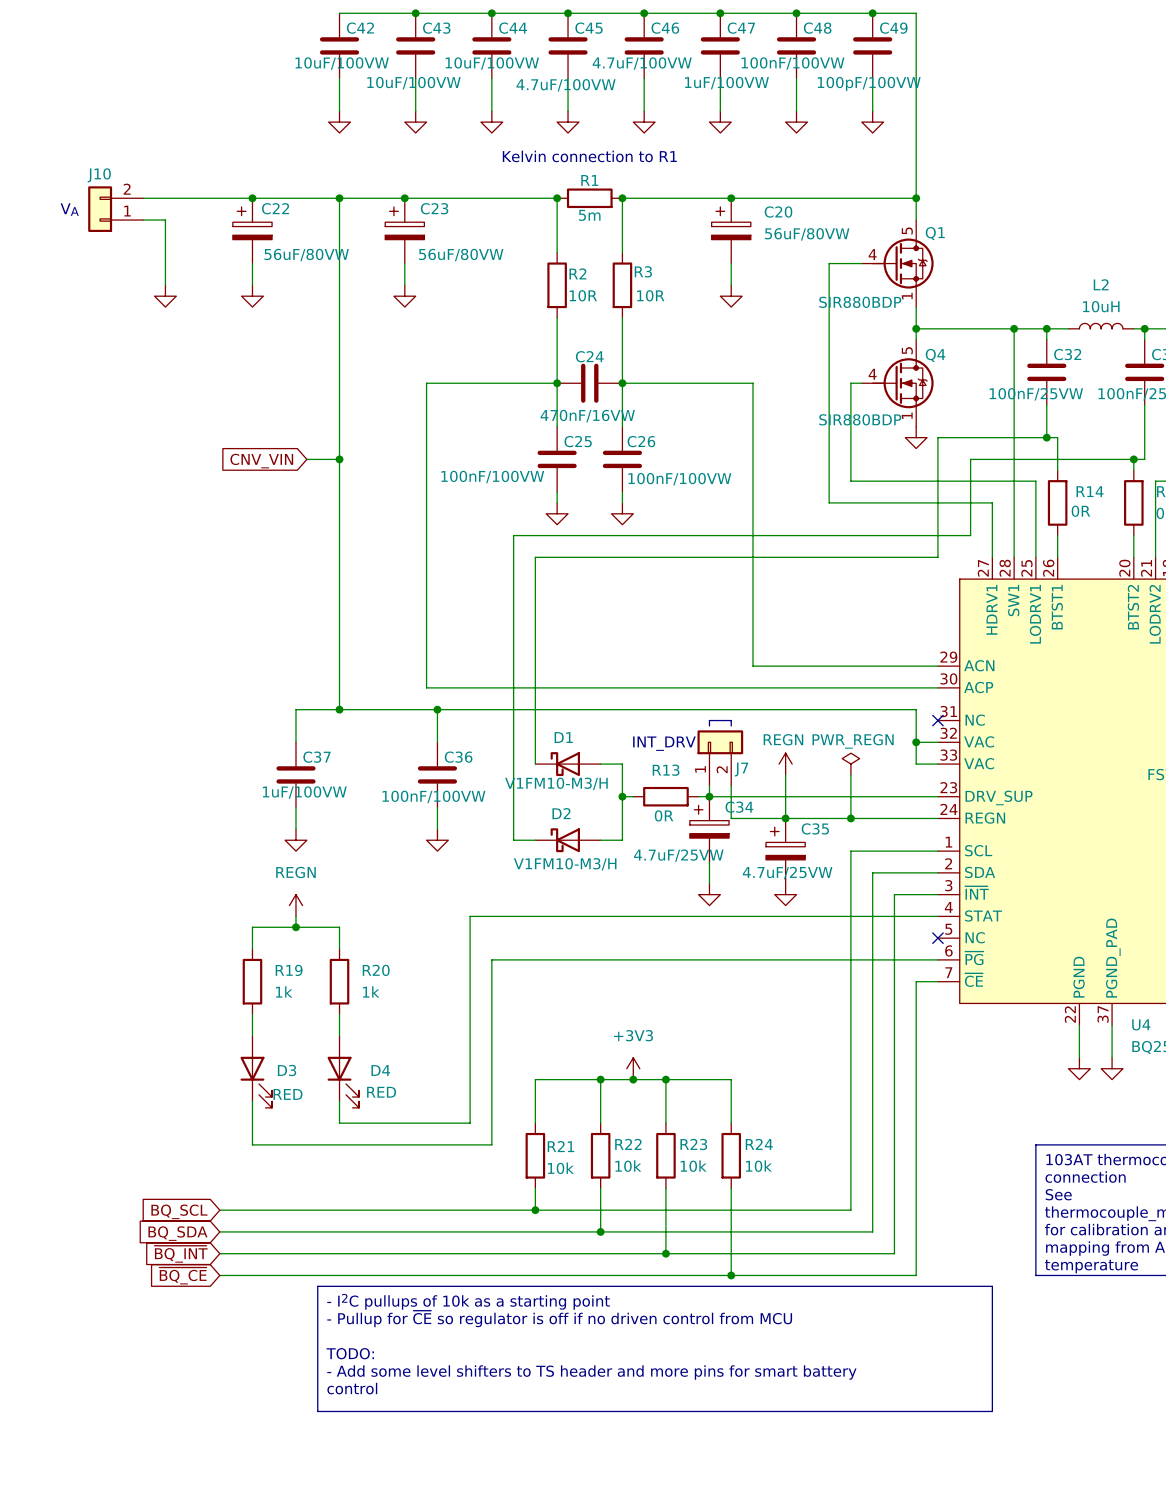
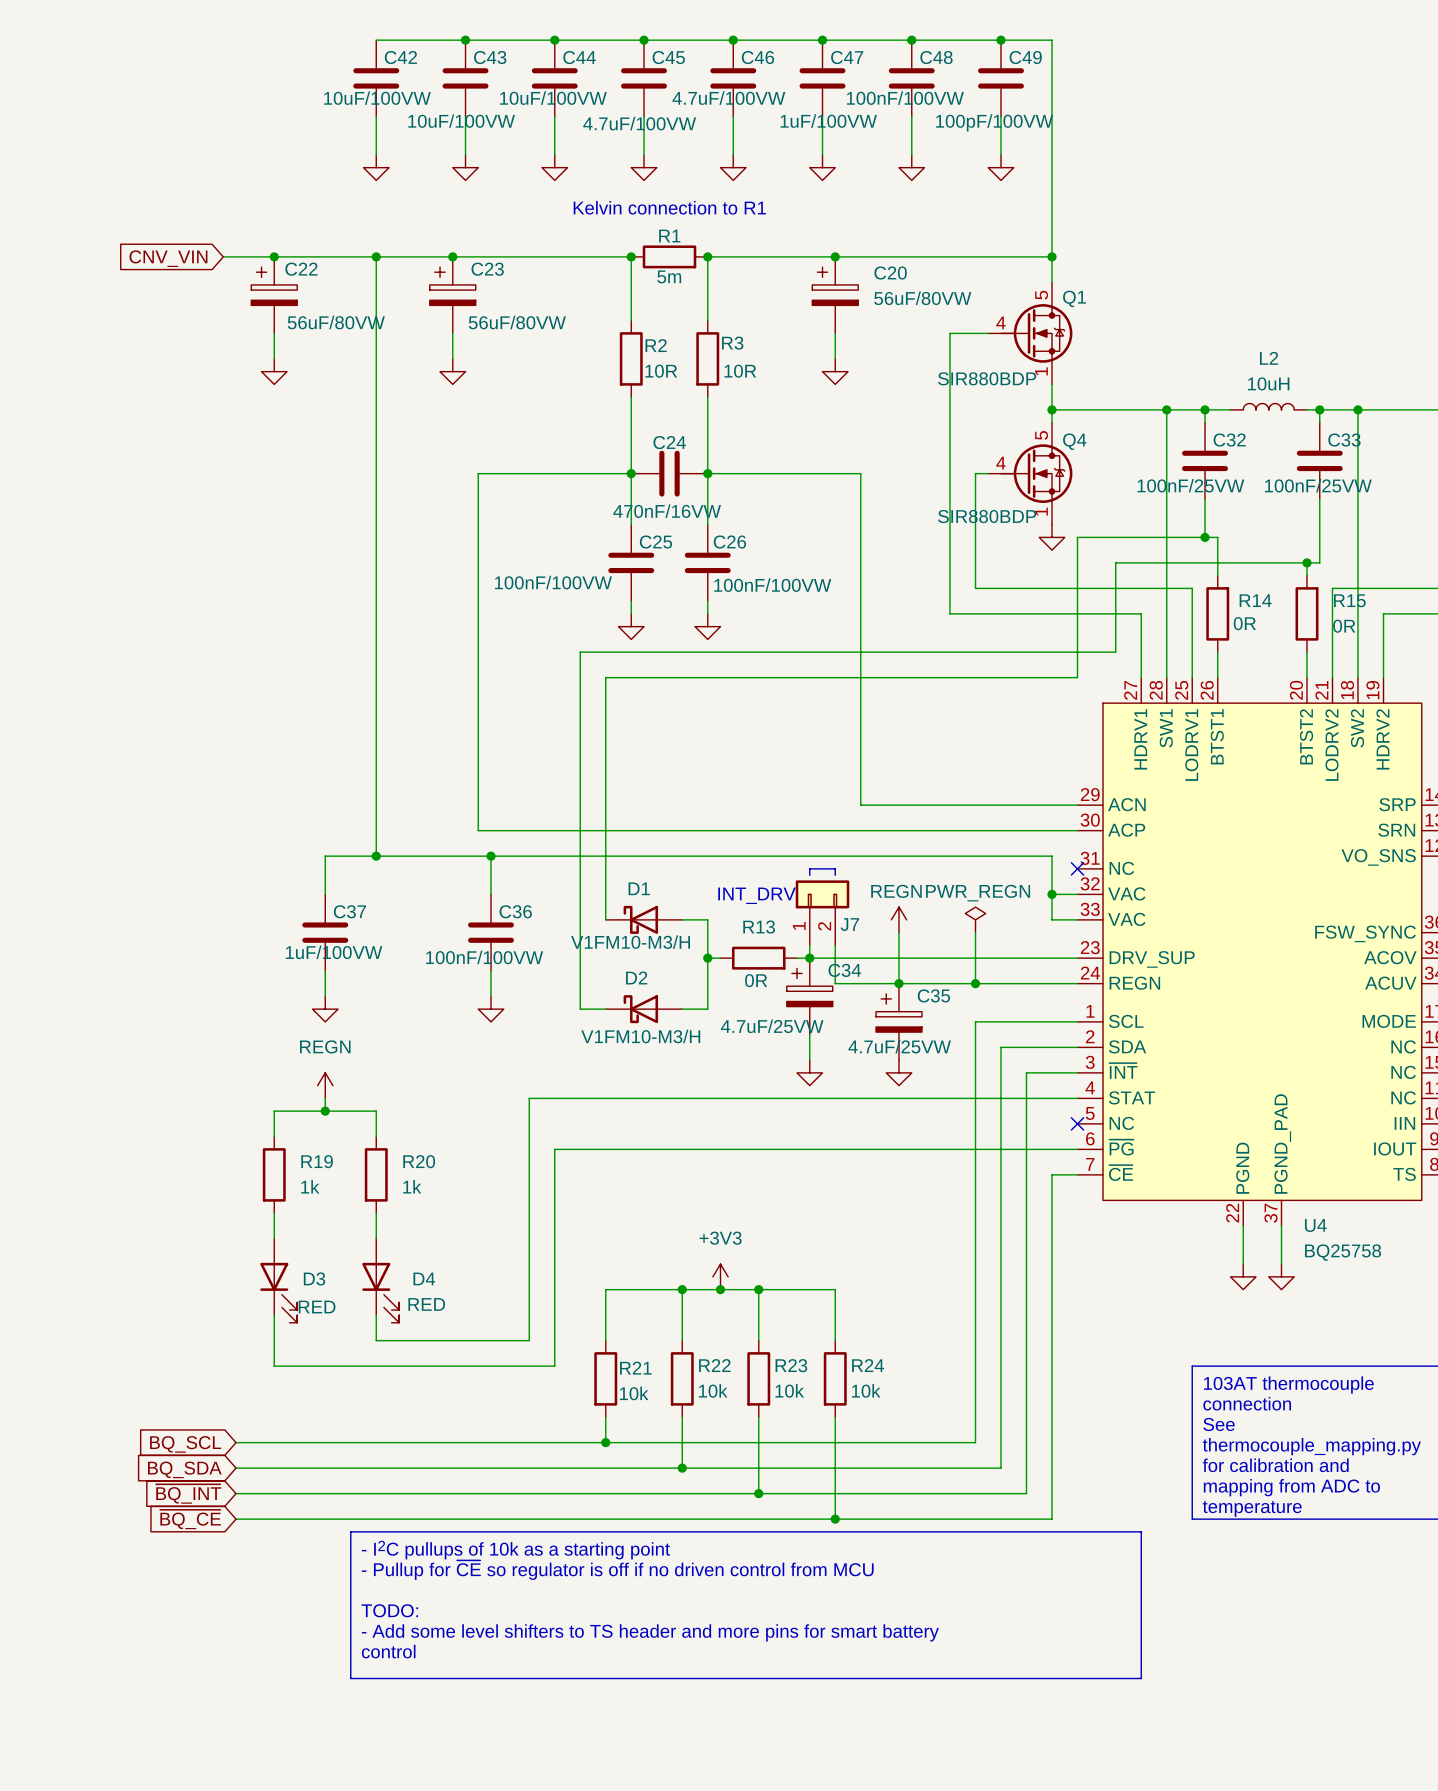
wire: (143, 198) (208, 198) -> none
global label: none -> CNV_VIN (168, 258)
text: VA (69, 209) -> none
J10: (115, 209) -> none
wire: (143, 220) (165, 220) (165, 285) -> none
power symbol: (165, 296) -> none
wire: (306, 459) (339, 459) -> none
junction: (339, 459) -> none
global label: CNV_VIN (261, 461) -> none

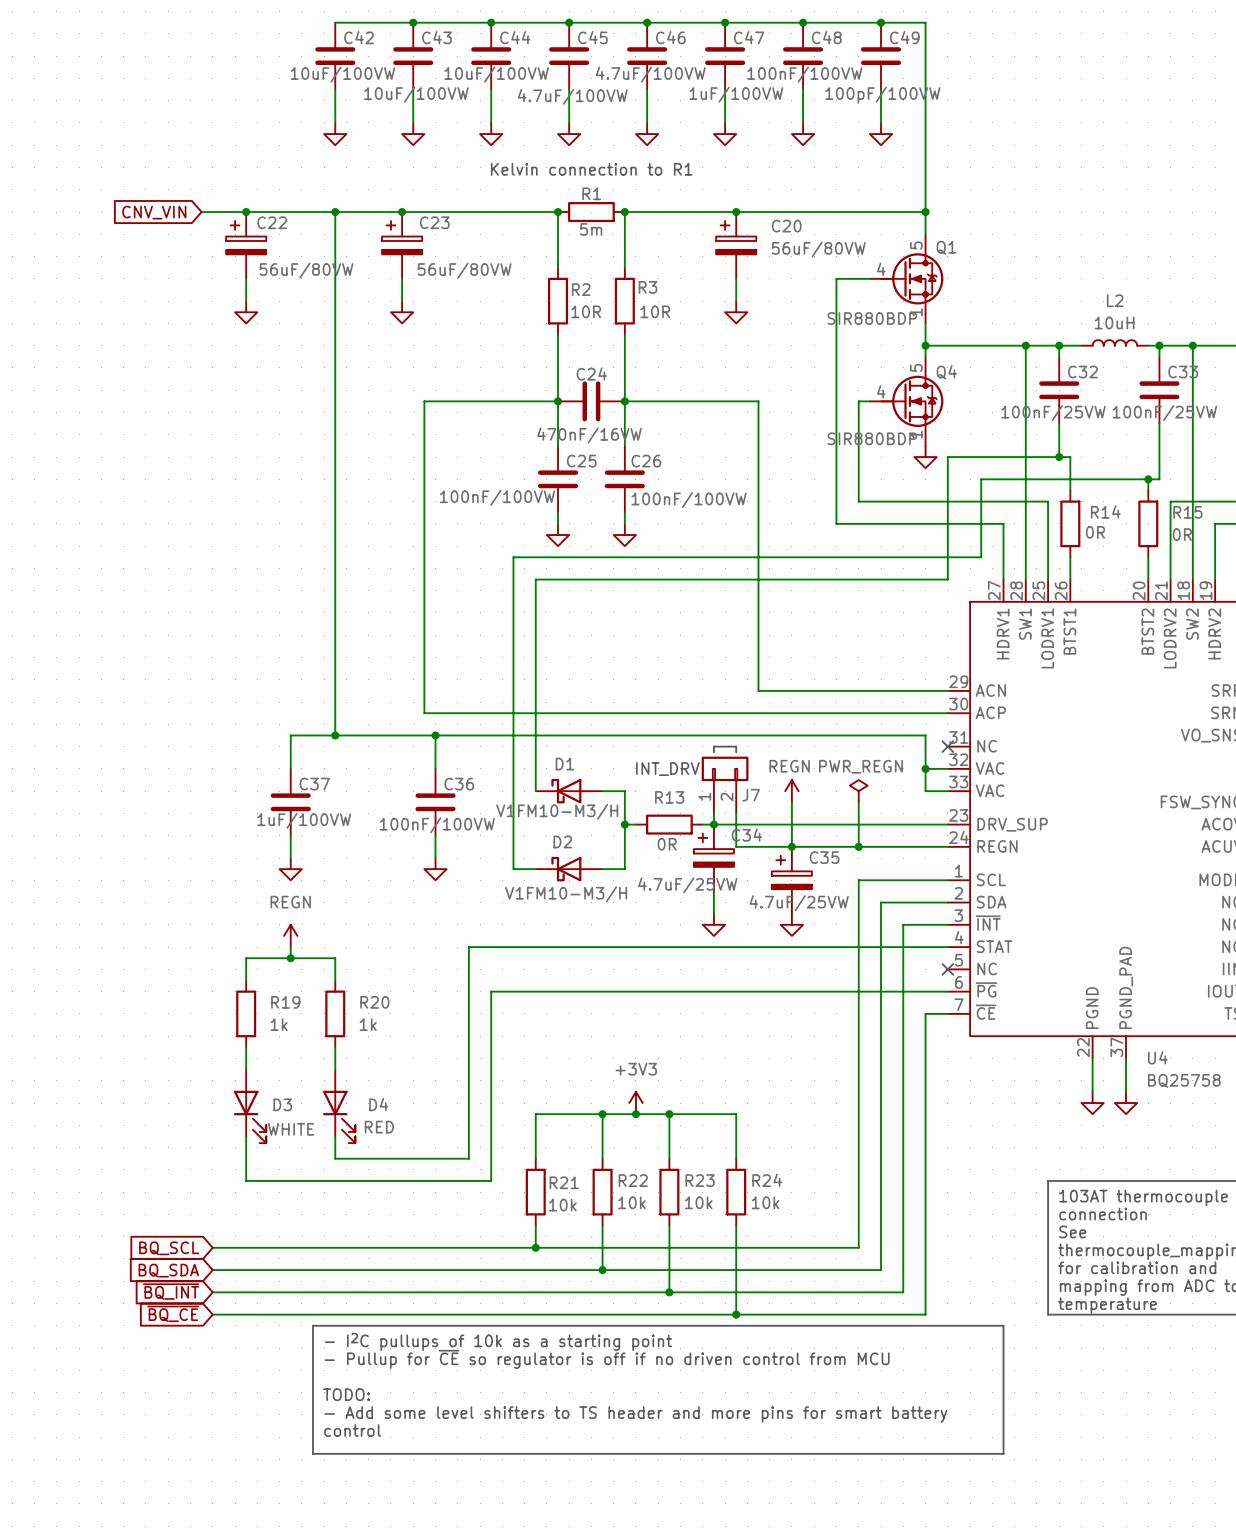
D3 value: RED (317, 1307) -> WHITE (290, 1129)

